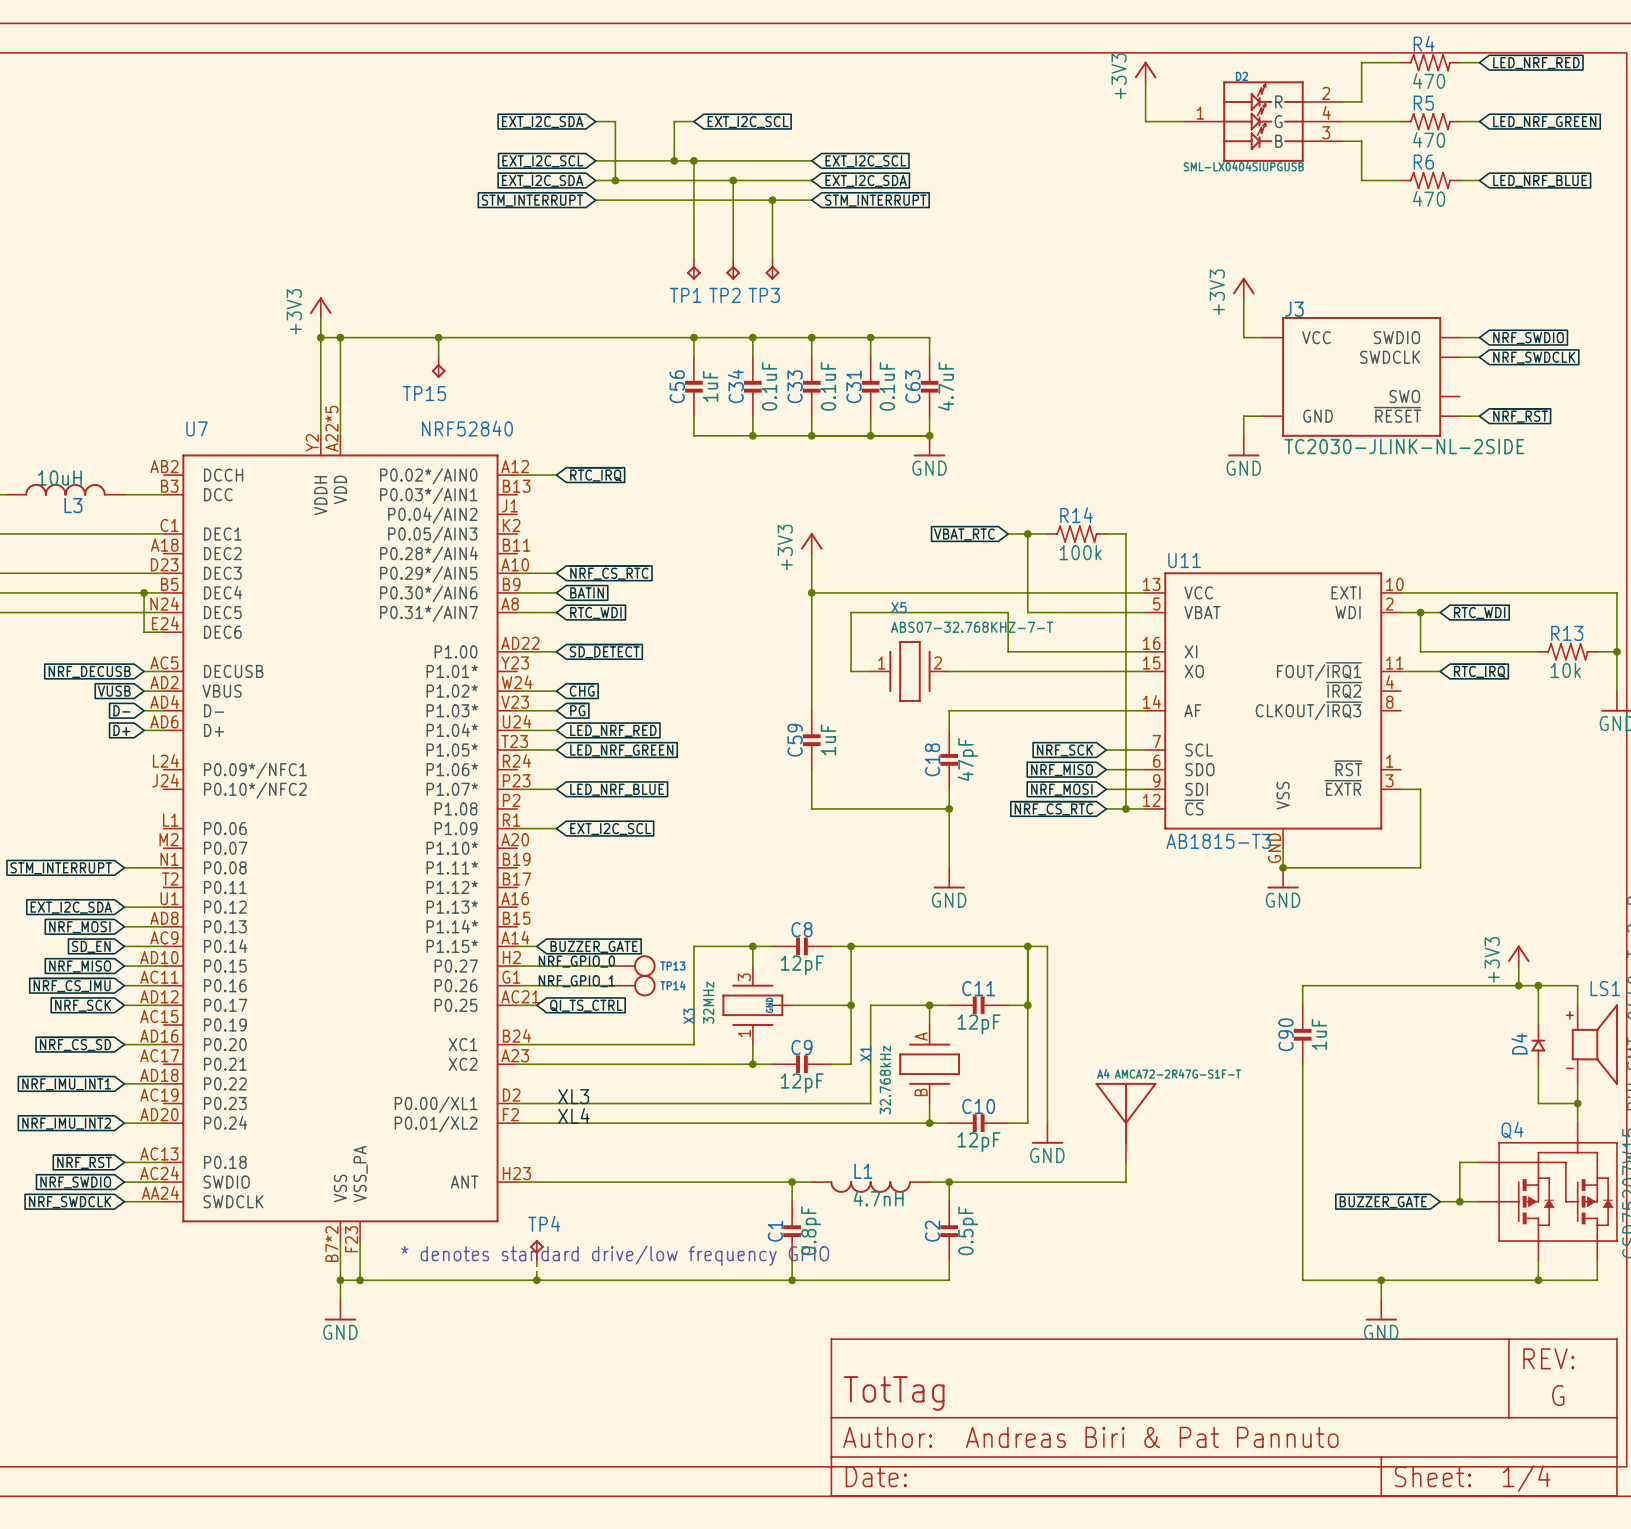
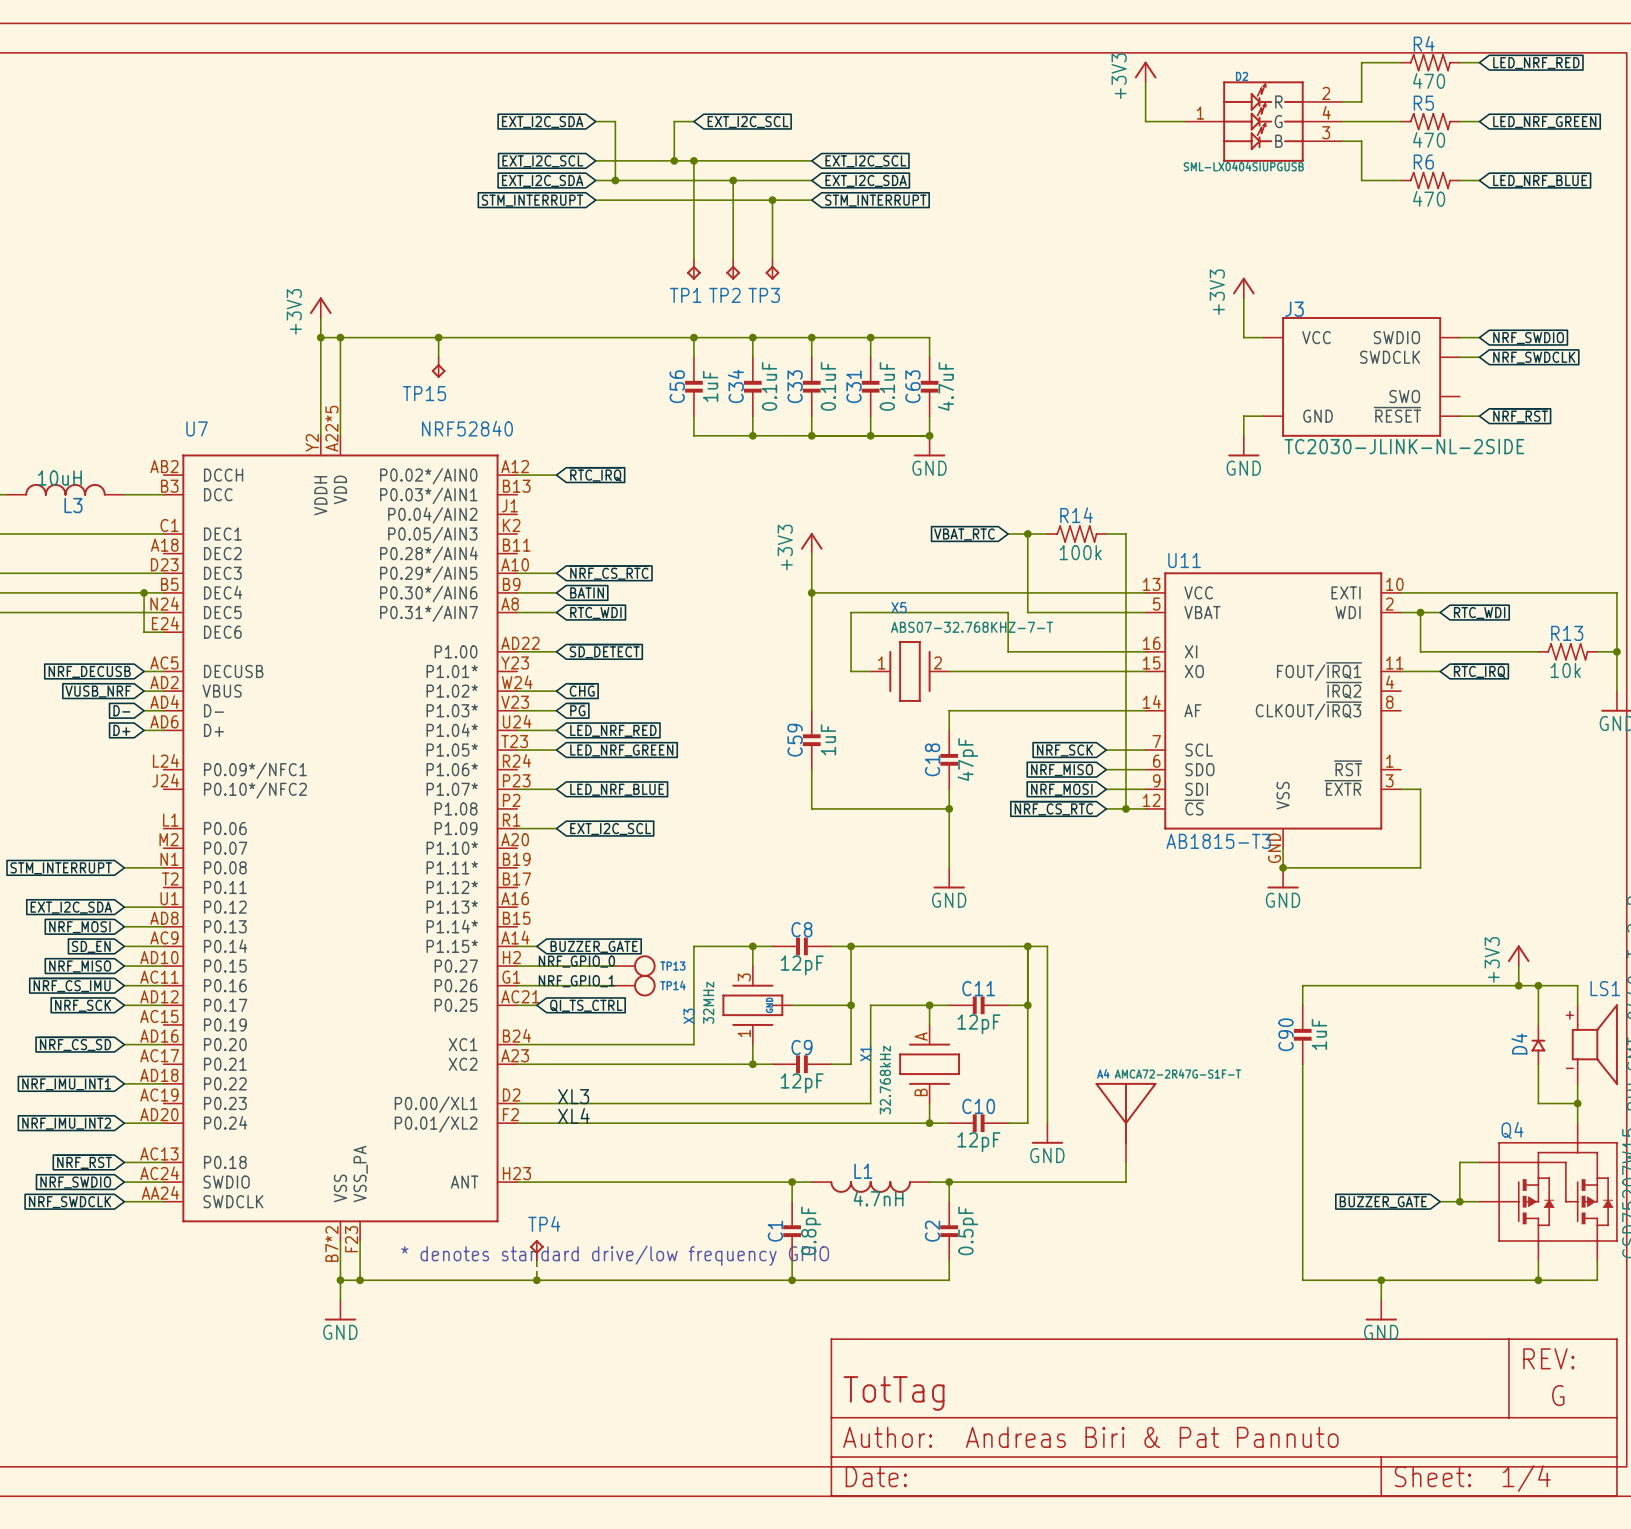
global label: VUSB (114, 691) -> VUSB_NRF (98, 691)

